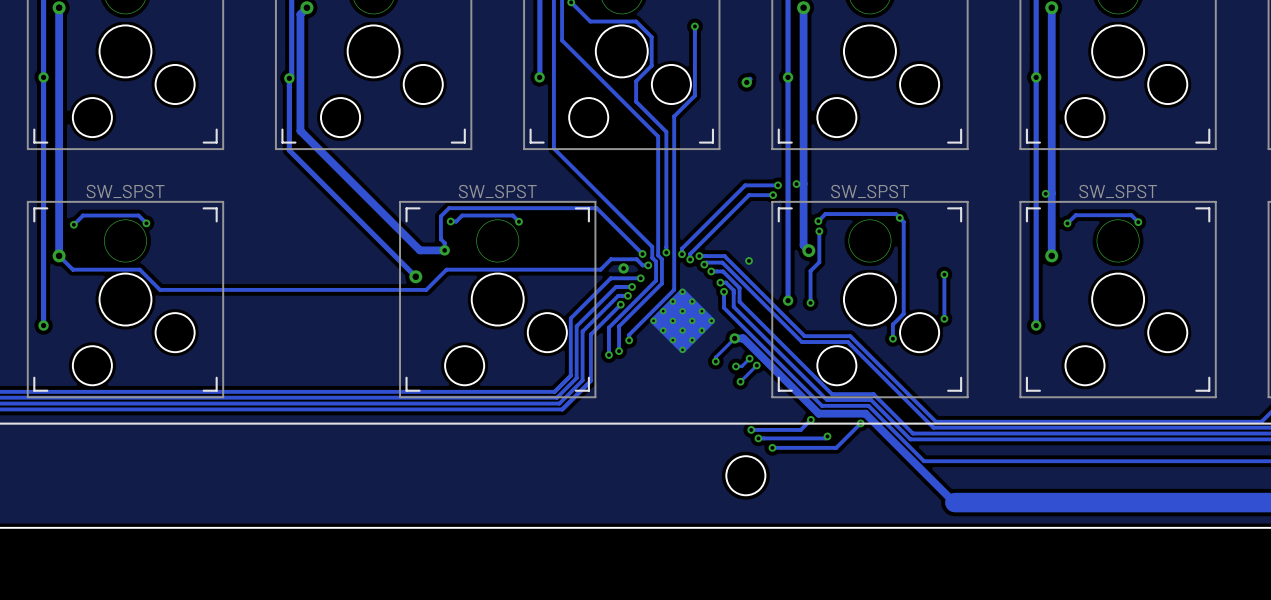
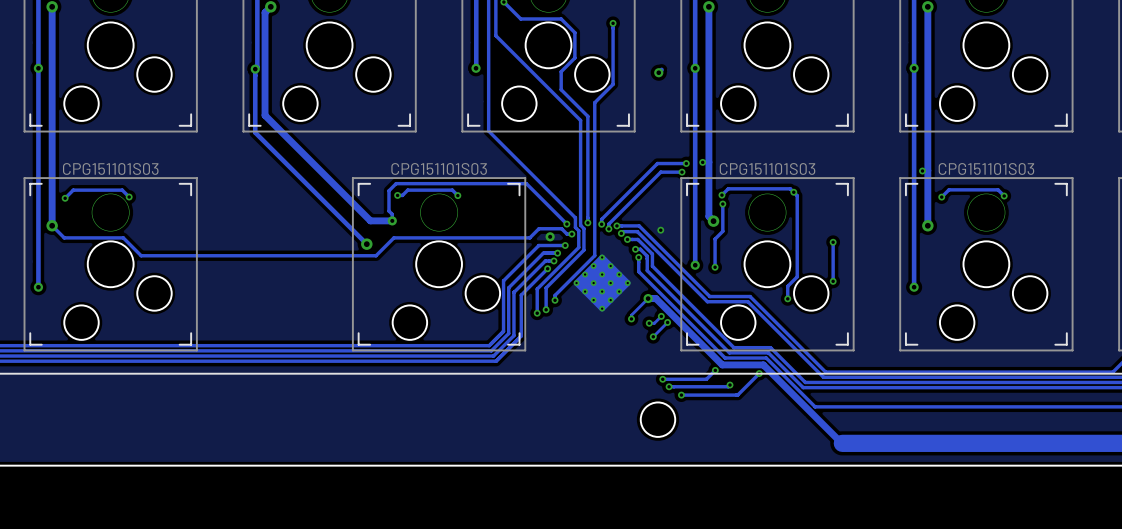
part value: SW_SPST (125, 191) -> CPG151101S03 (110, 168)
part value: SW_SPST (497, 191) -> CPG151101S03 (439, 168)
part value: SW_SPST (870, 191) -> CPG151101S03 (767, 168)
part value: SW_SPST (1118, 191) -> CPG151101S03 (986, 168)

